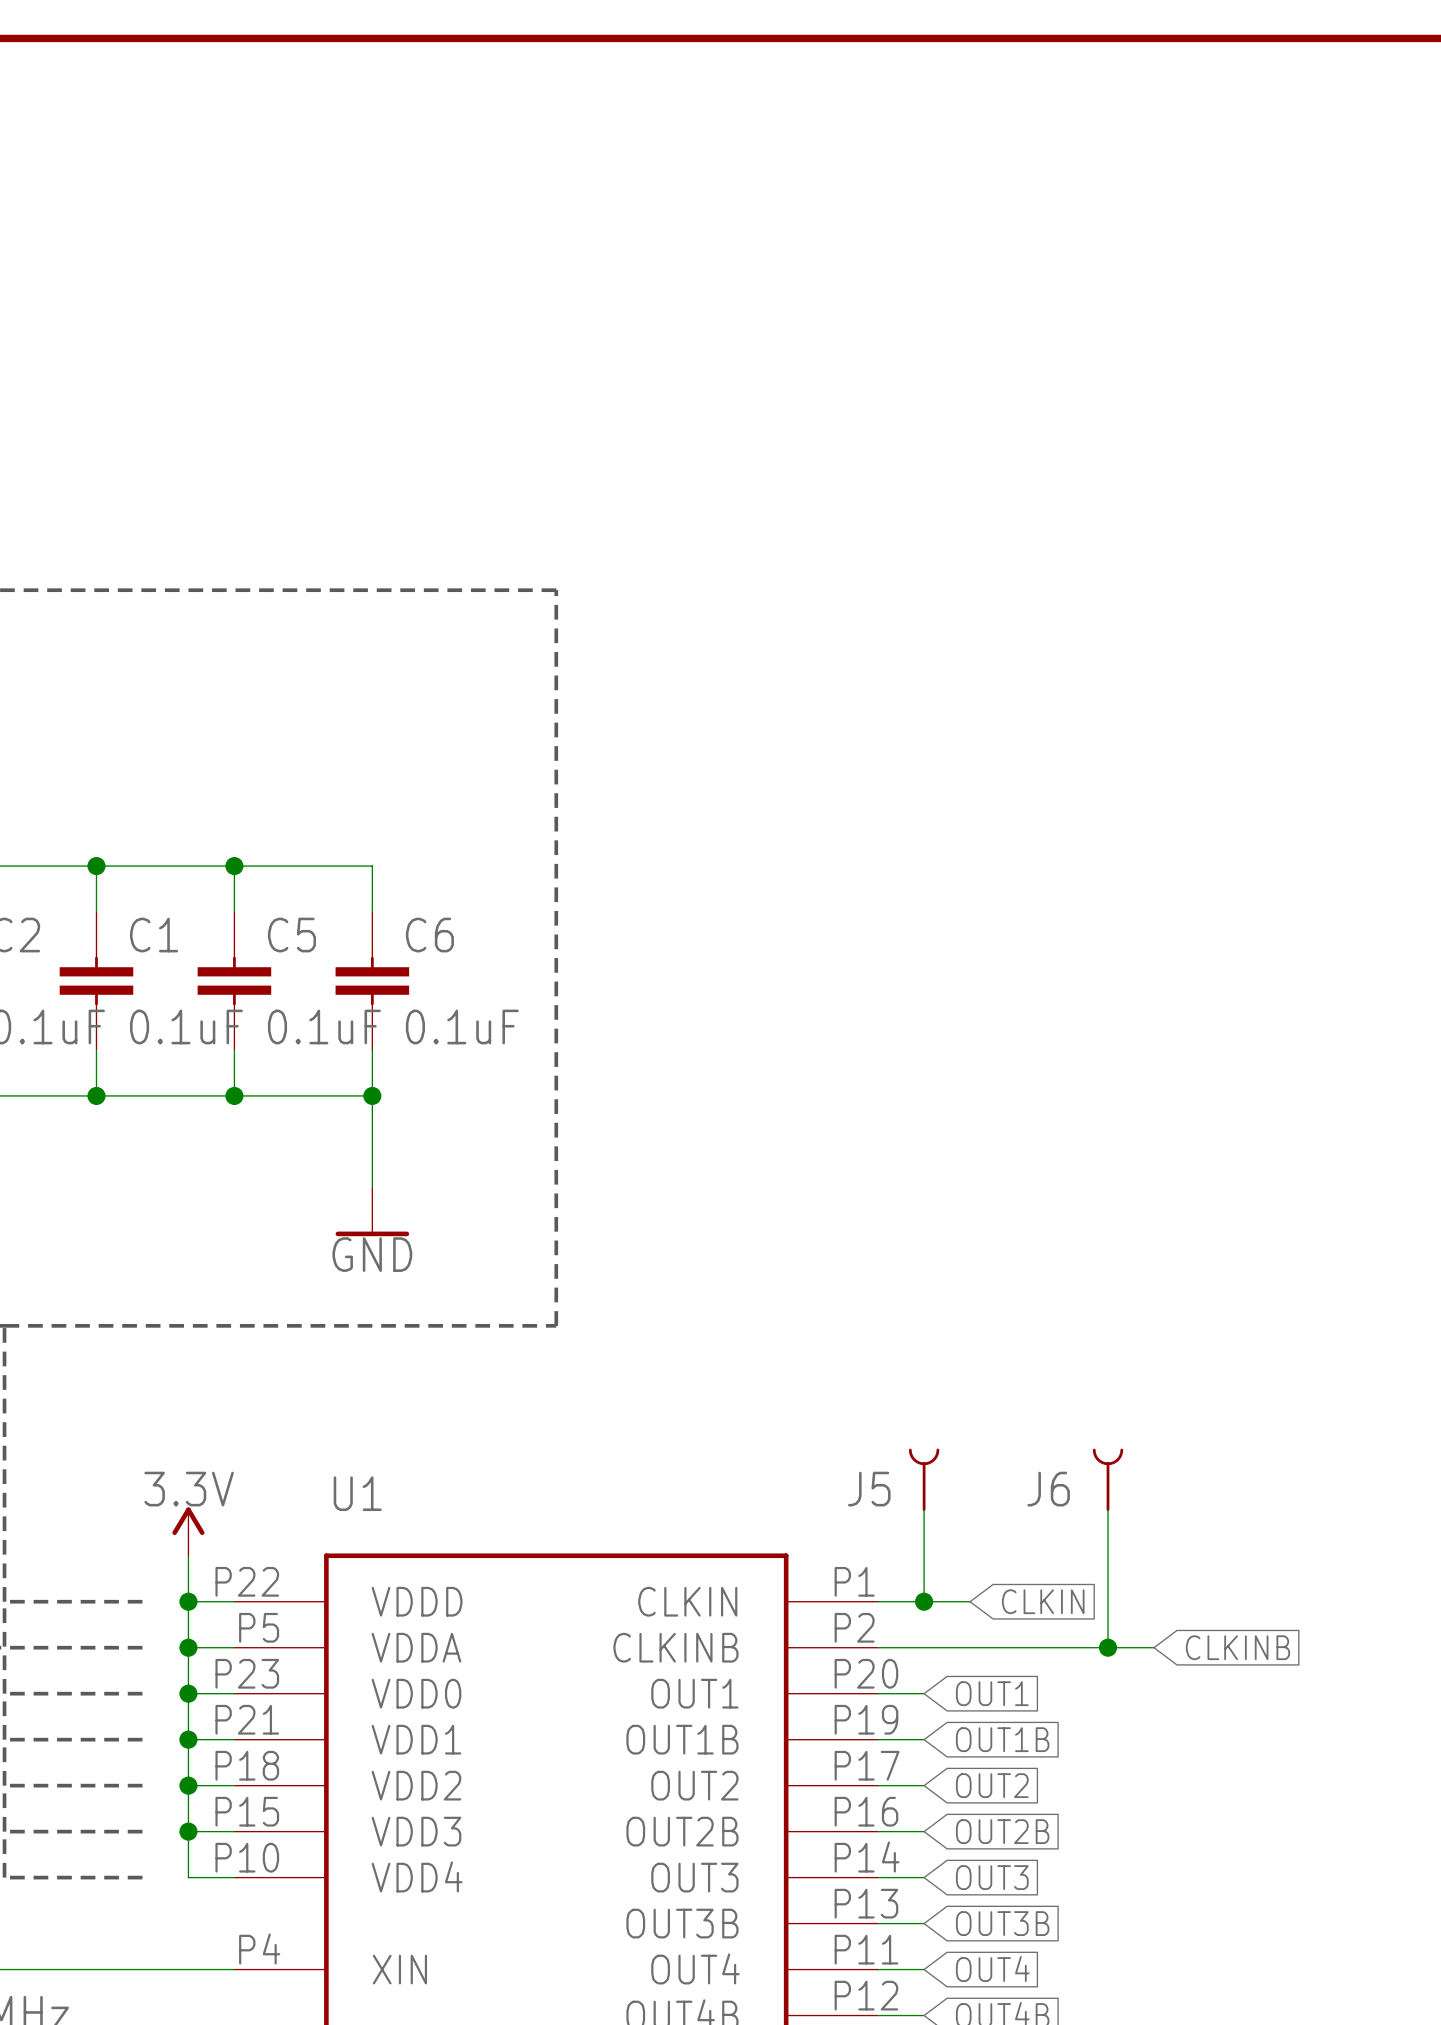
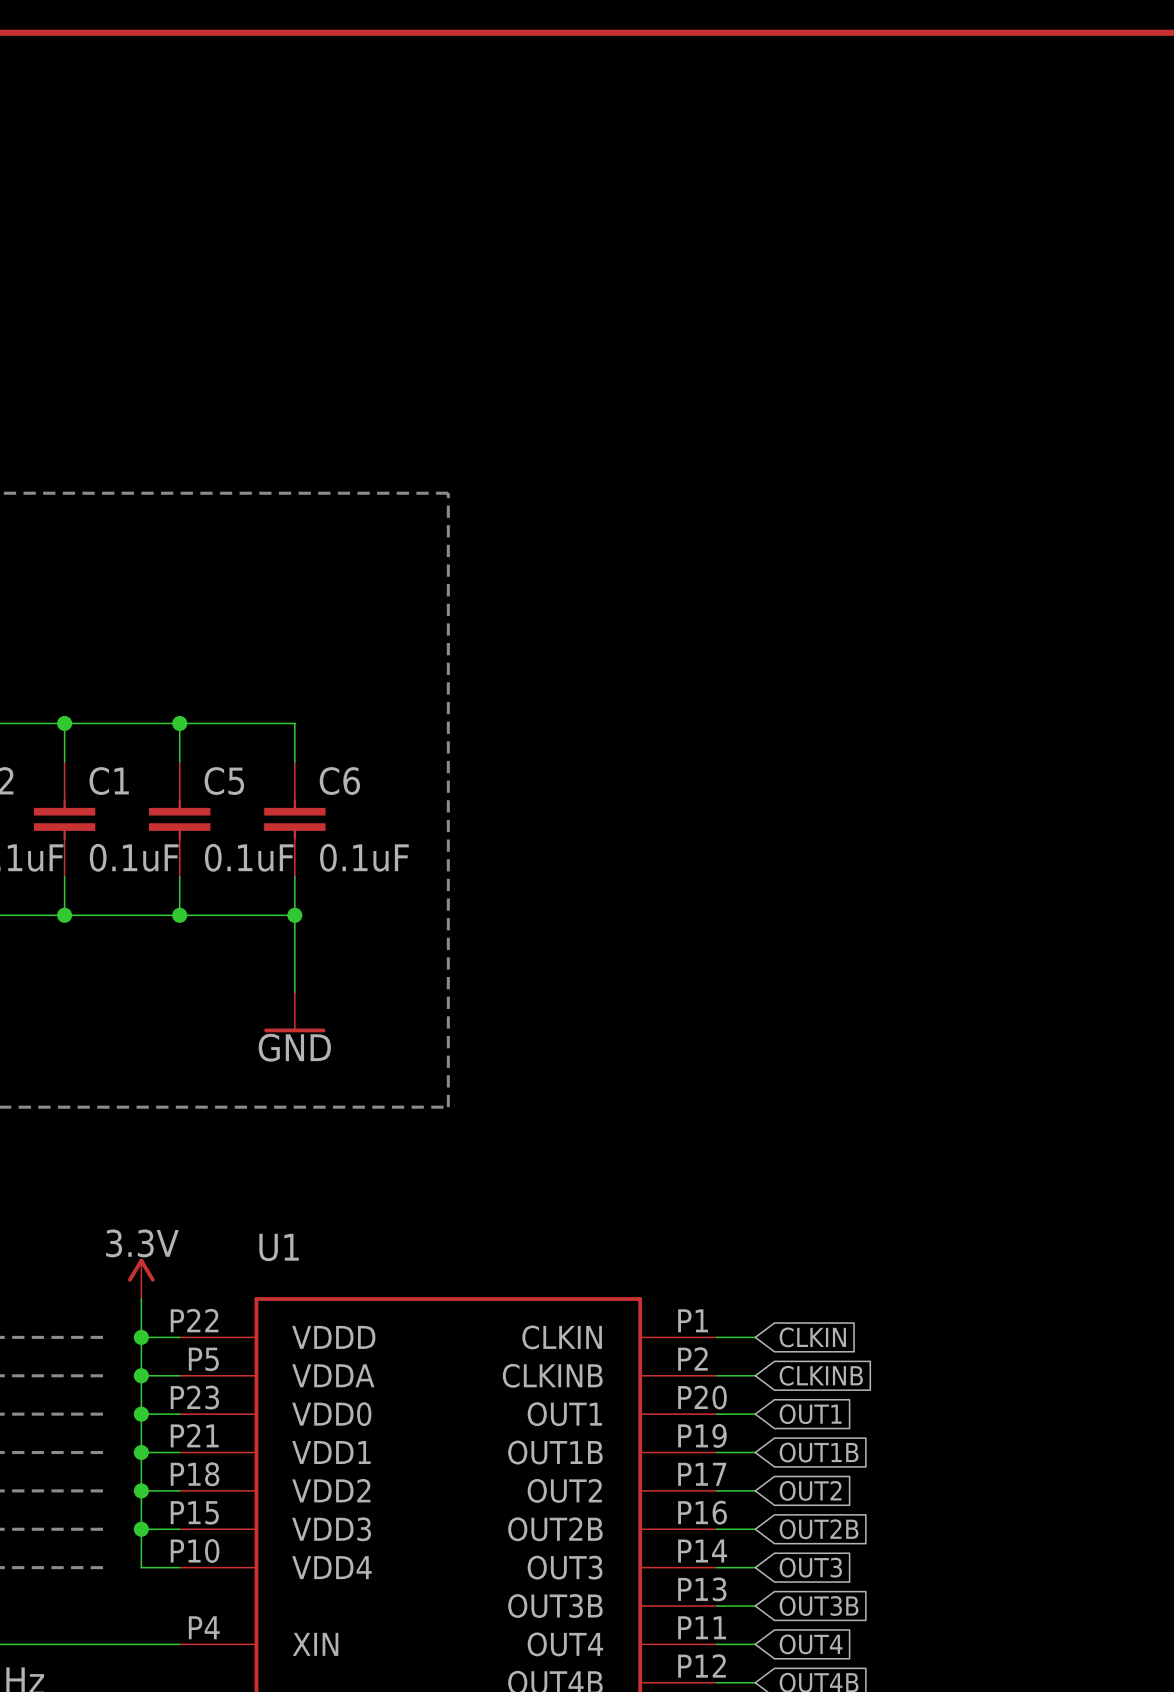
J5: (924, 1479) -> none
J6: (1108, 1479) -> none
wire: (924, 1509) (924, 1601) (970, 1601) -> none
wire: (1108, 1509) (1108, 1647) -> none
junction: (924, 1601) -> none
global label position: CLKIN (1043, 1601) -> CLKIN (812, 1337)
wire: (924, 1647) (1153, 1647) -> none
junction: (1108, 1647) -> none
global label position: CLKINB (1237, 1647) -> CLKINB (821, 1375)

